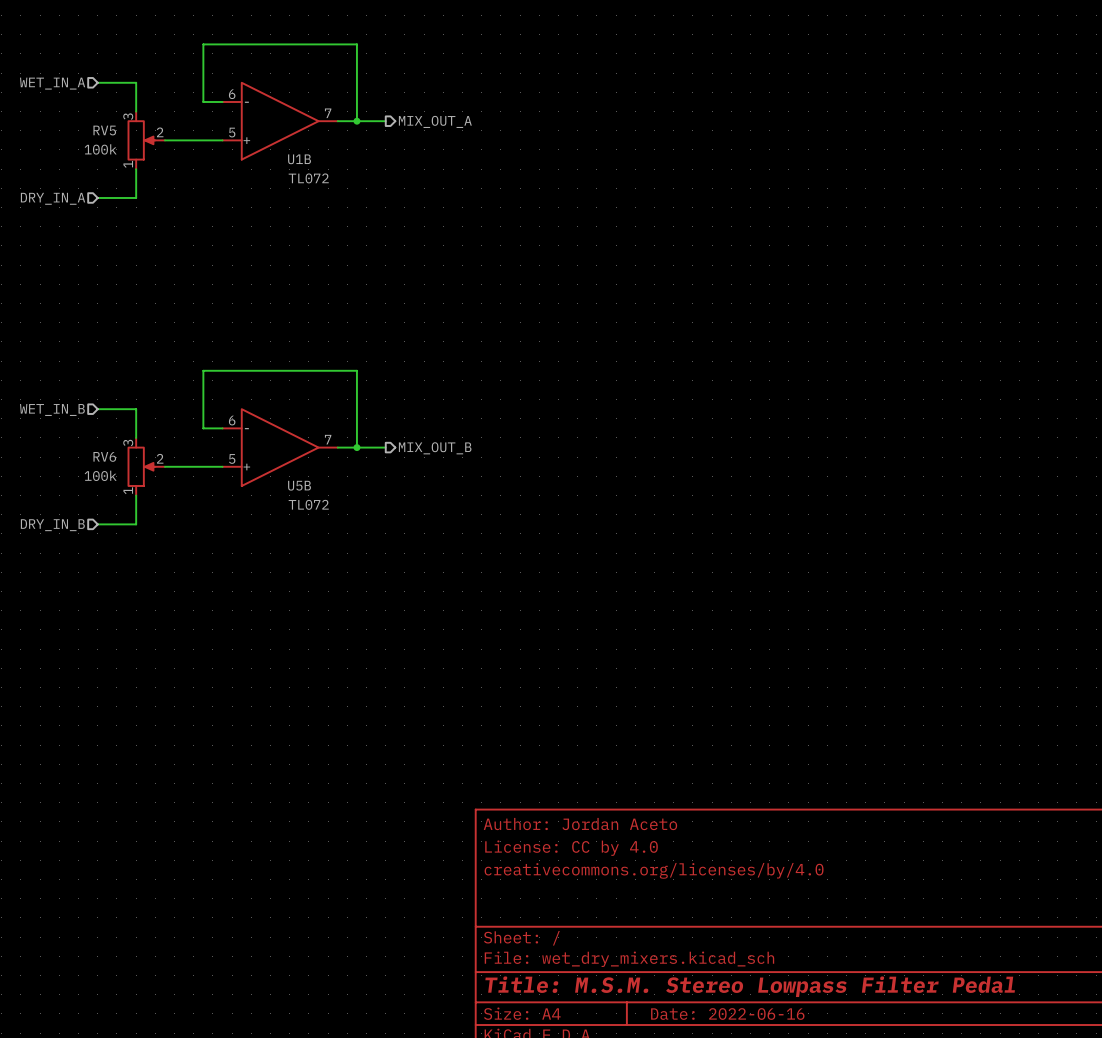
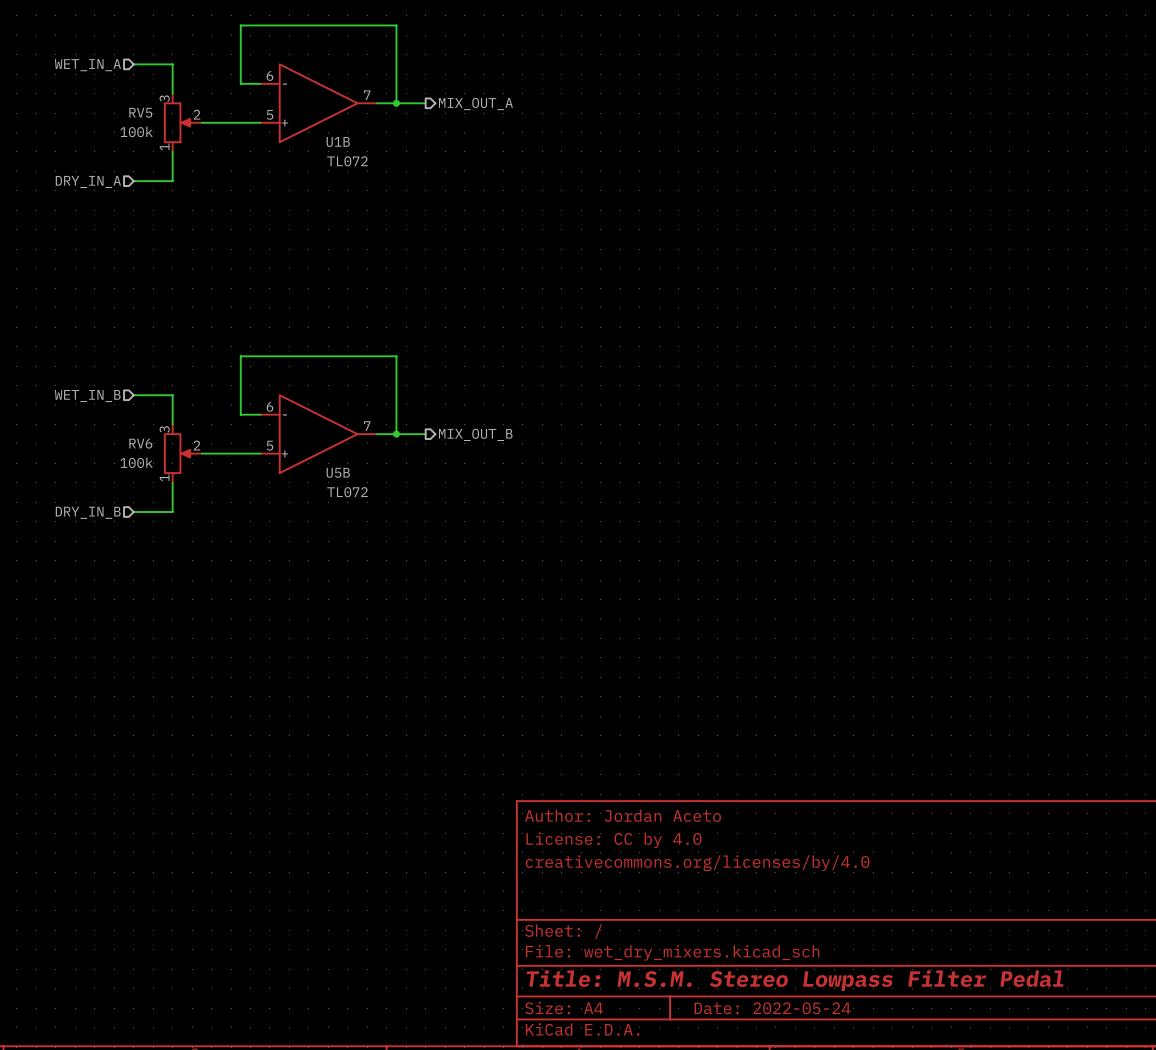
title block: Date: 2022-06-16 (727, 1014) -> Date: 2022-05-24 (772, 1008)

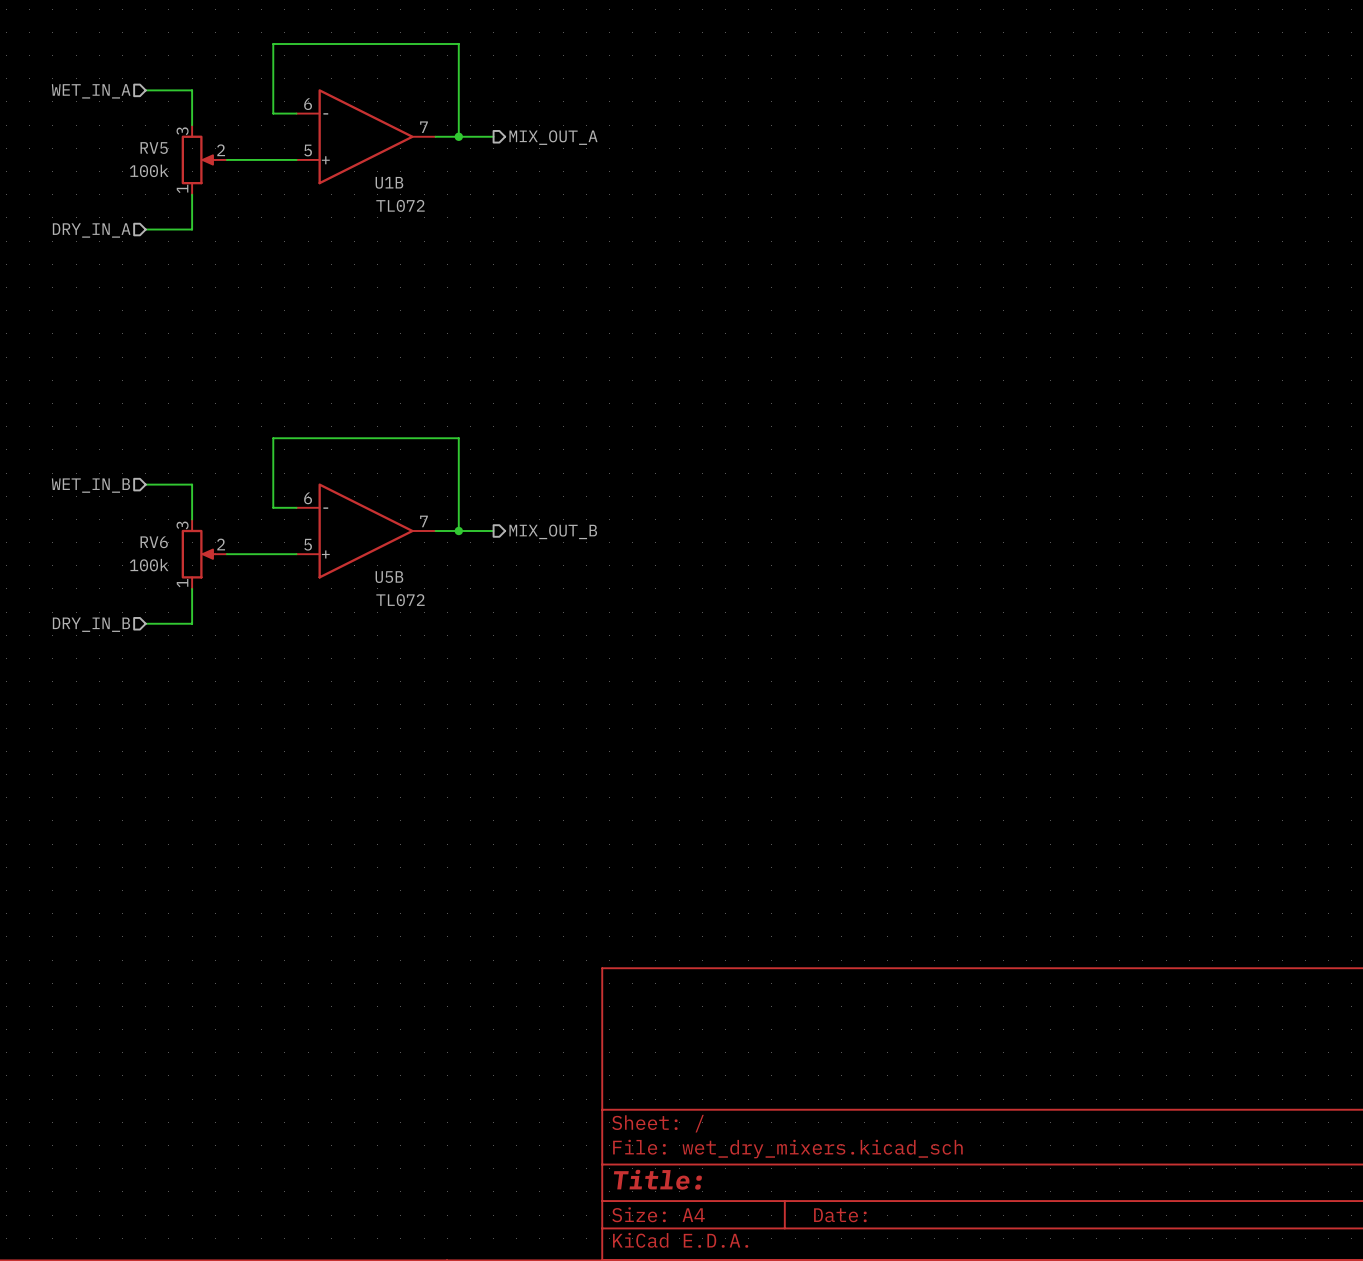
title block: Author: Jordan Aceto (623, 815) -> none
title block: License: CC by 4.0 (613, 840) -> none
title block: creativecommons.org/licenses/by/4.0 (697, 863) -> none
title block: Title: M.S.M. Stereo Lowpass Filter Pedal (795, 980) -> Title: (657, 1179)
title block: Date: 2022-05-24 (772, 1008) -> Date: (840, 1215)

